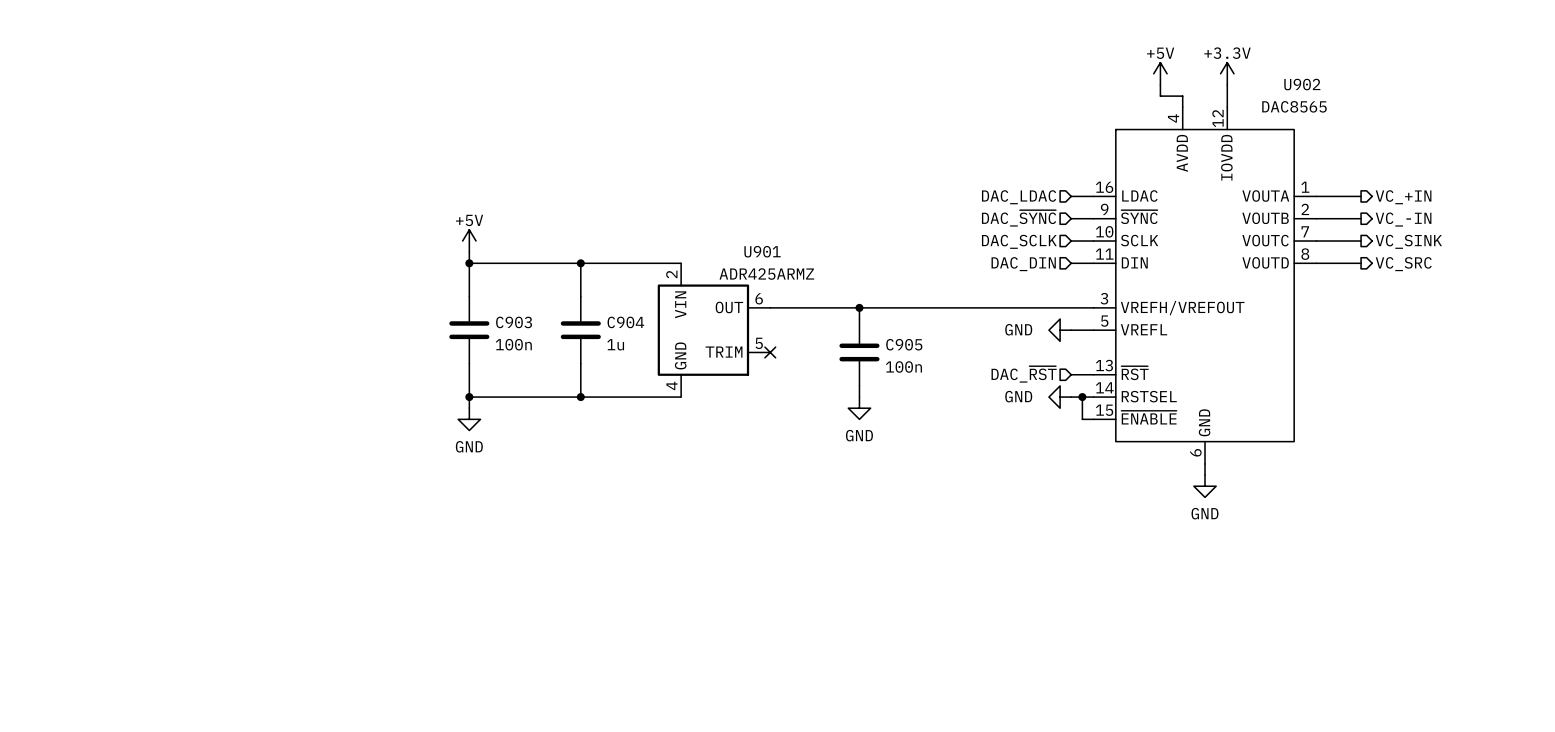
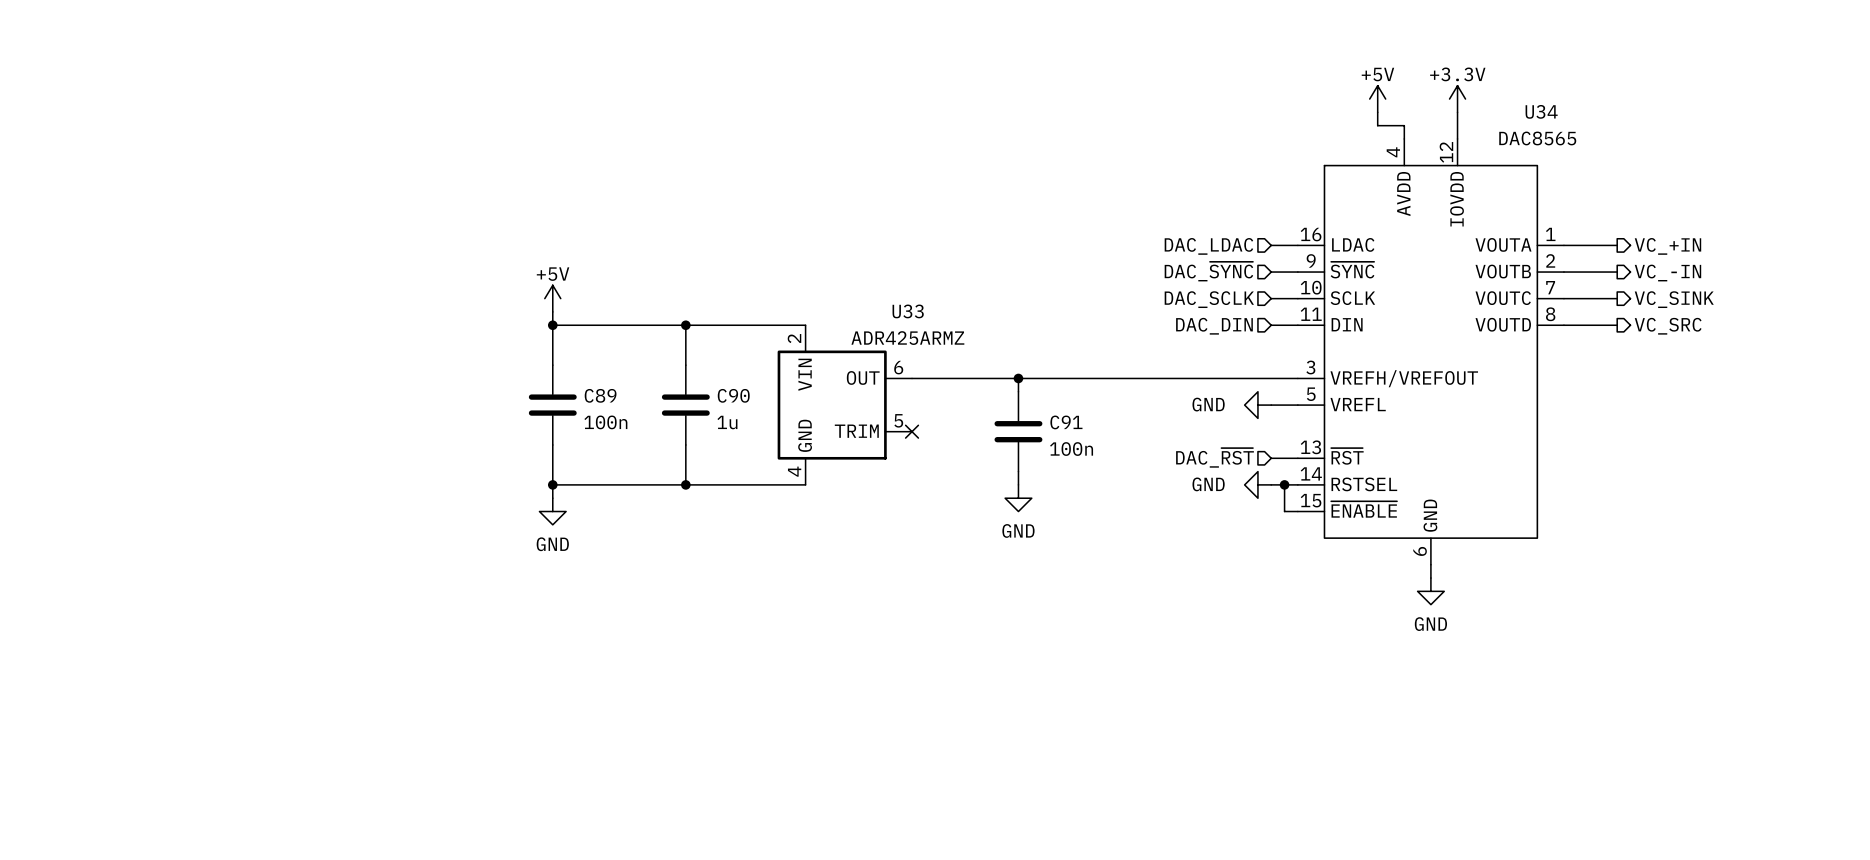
U902 name: U902 (1302, 84) -> U34 (1541, 111)
U901 name: U901 (762, 251) -> U33 (908, 311)
C903 name: C903 (514, 322) -> C89 (600, 395)
C904 name: C904 (625, 322) -> C90 (733, 395)
C905 name: C905 (904, 344) -> C91 (1066, 422)

